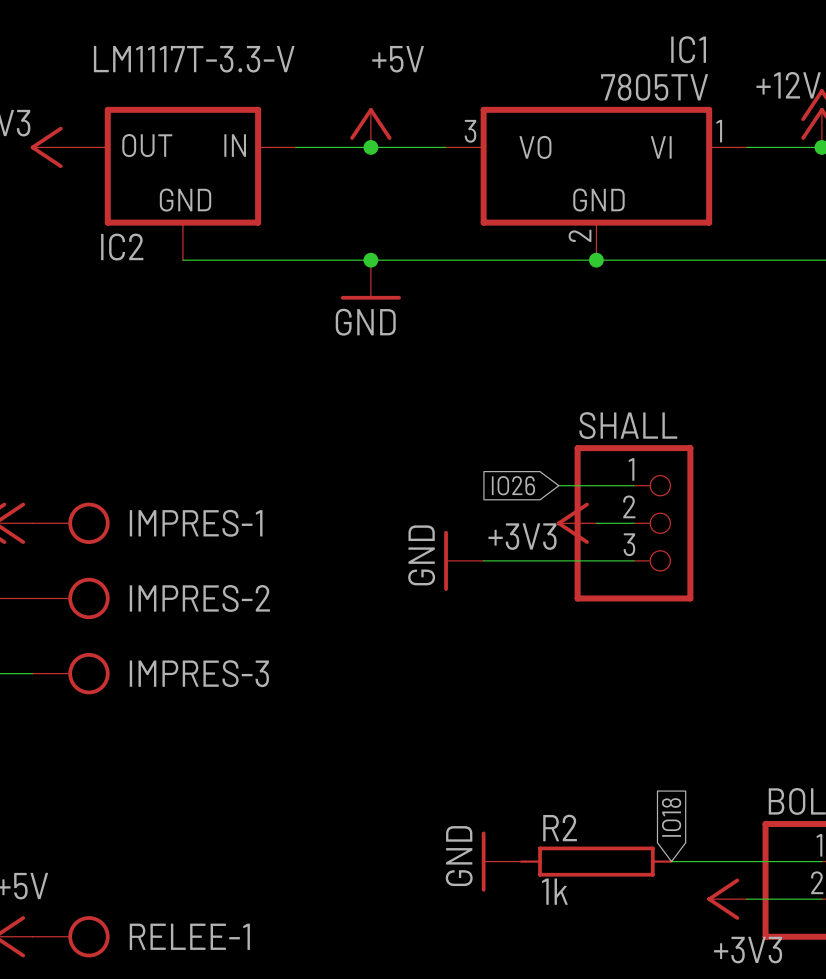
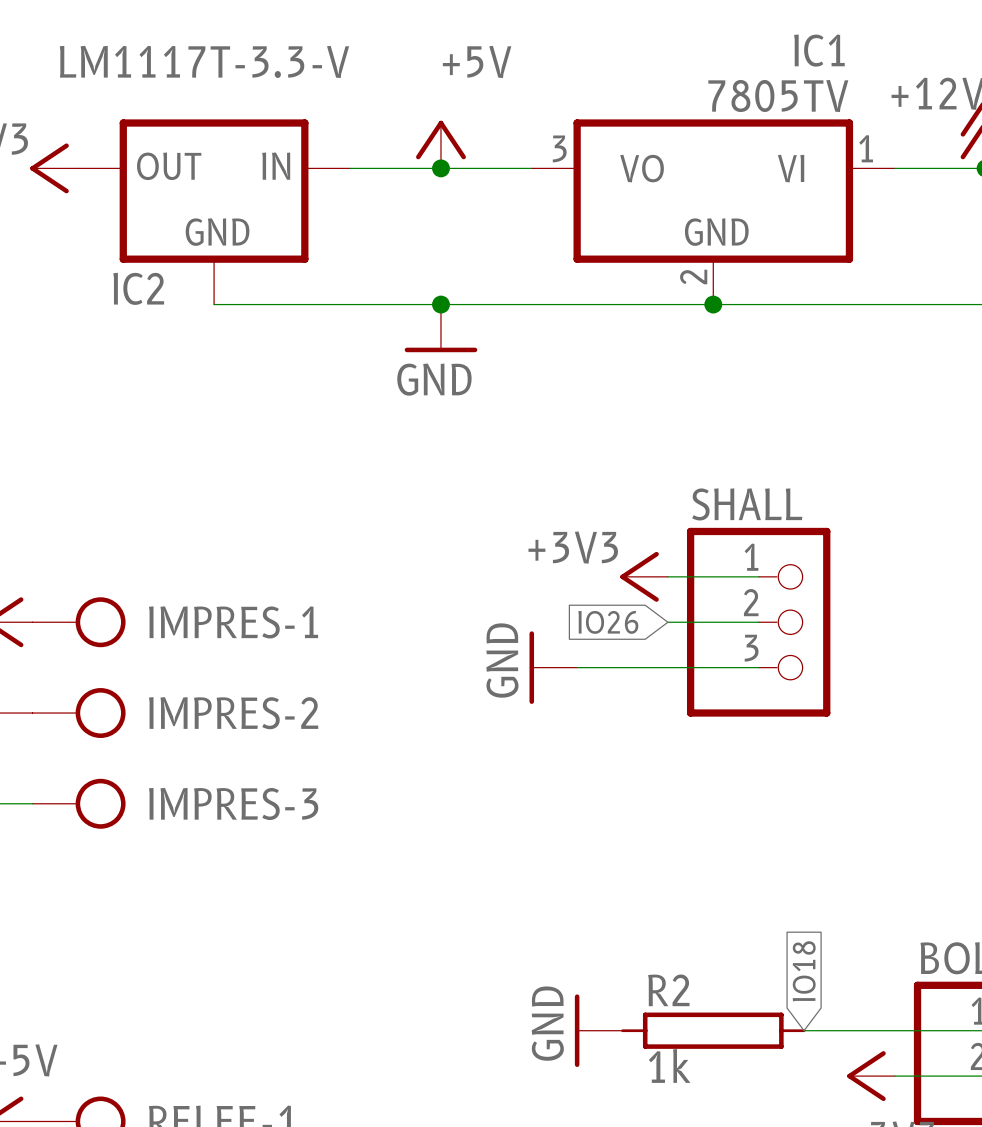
global label position: IO26 (513, 485) -> IO26 (608, 622)
power symbol position: +3V3 (576, 523) -> +3V3 (644, 576)
power symbol text position: +3V3 (522, 536) -> +3V3 (573, 547)

